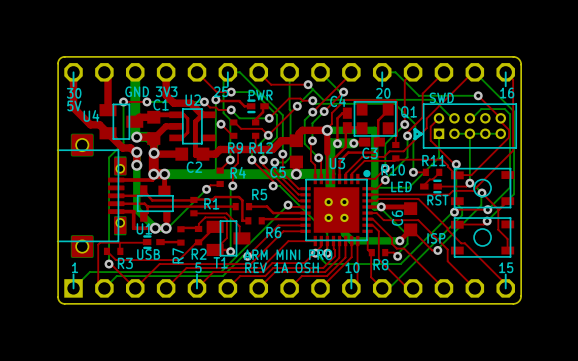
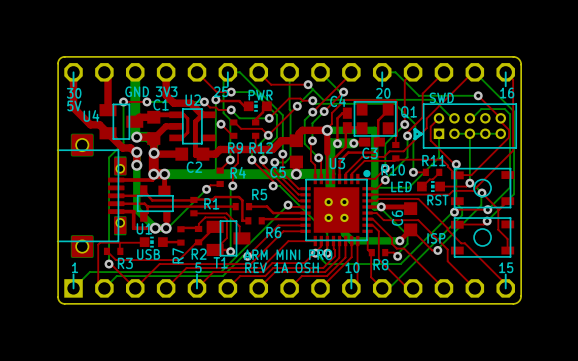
part footprint: [246, 99, 269, 114] -> [243, 100, 272, 112]
part footprint: [420, 179, 442, 194] -> [417, 181, 445, 193]
part footprint: [142, 235, 165, 250] -> [139, 236, 168, 248]

